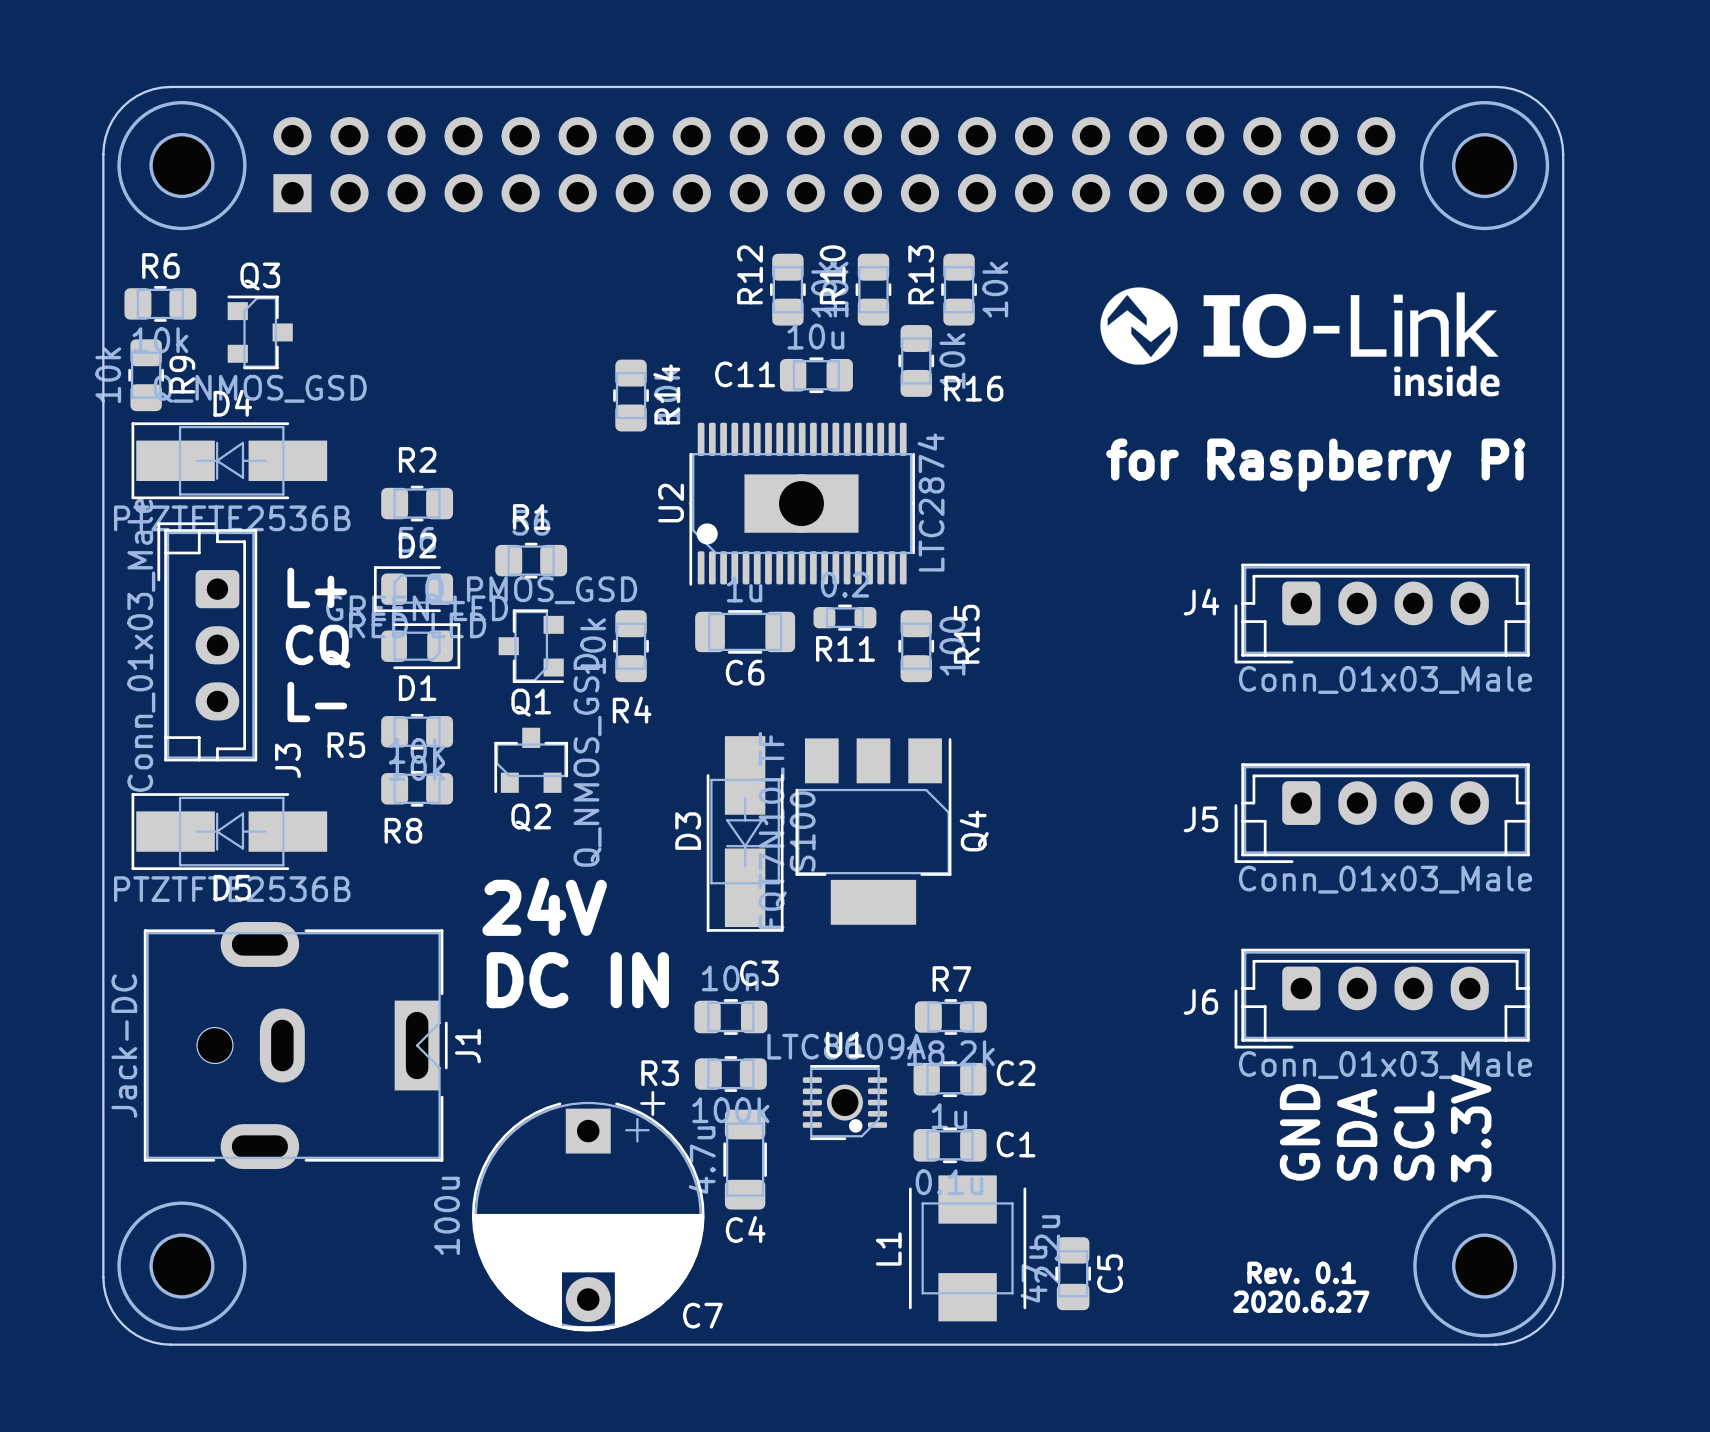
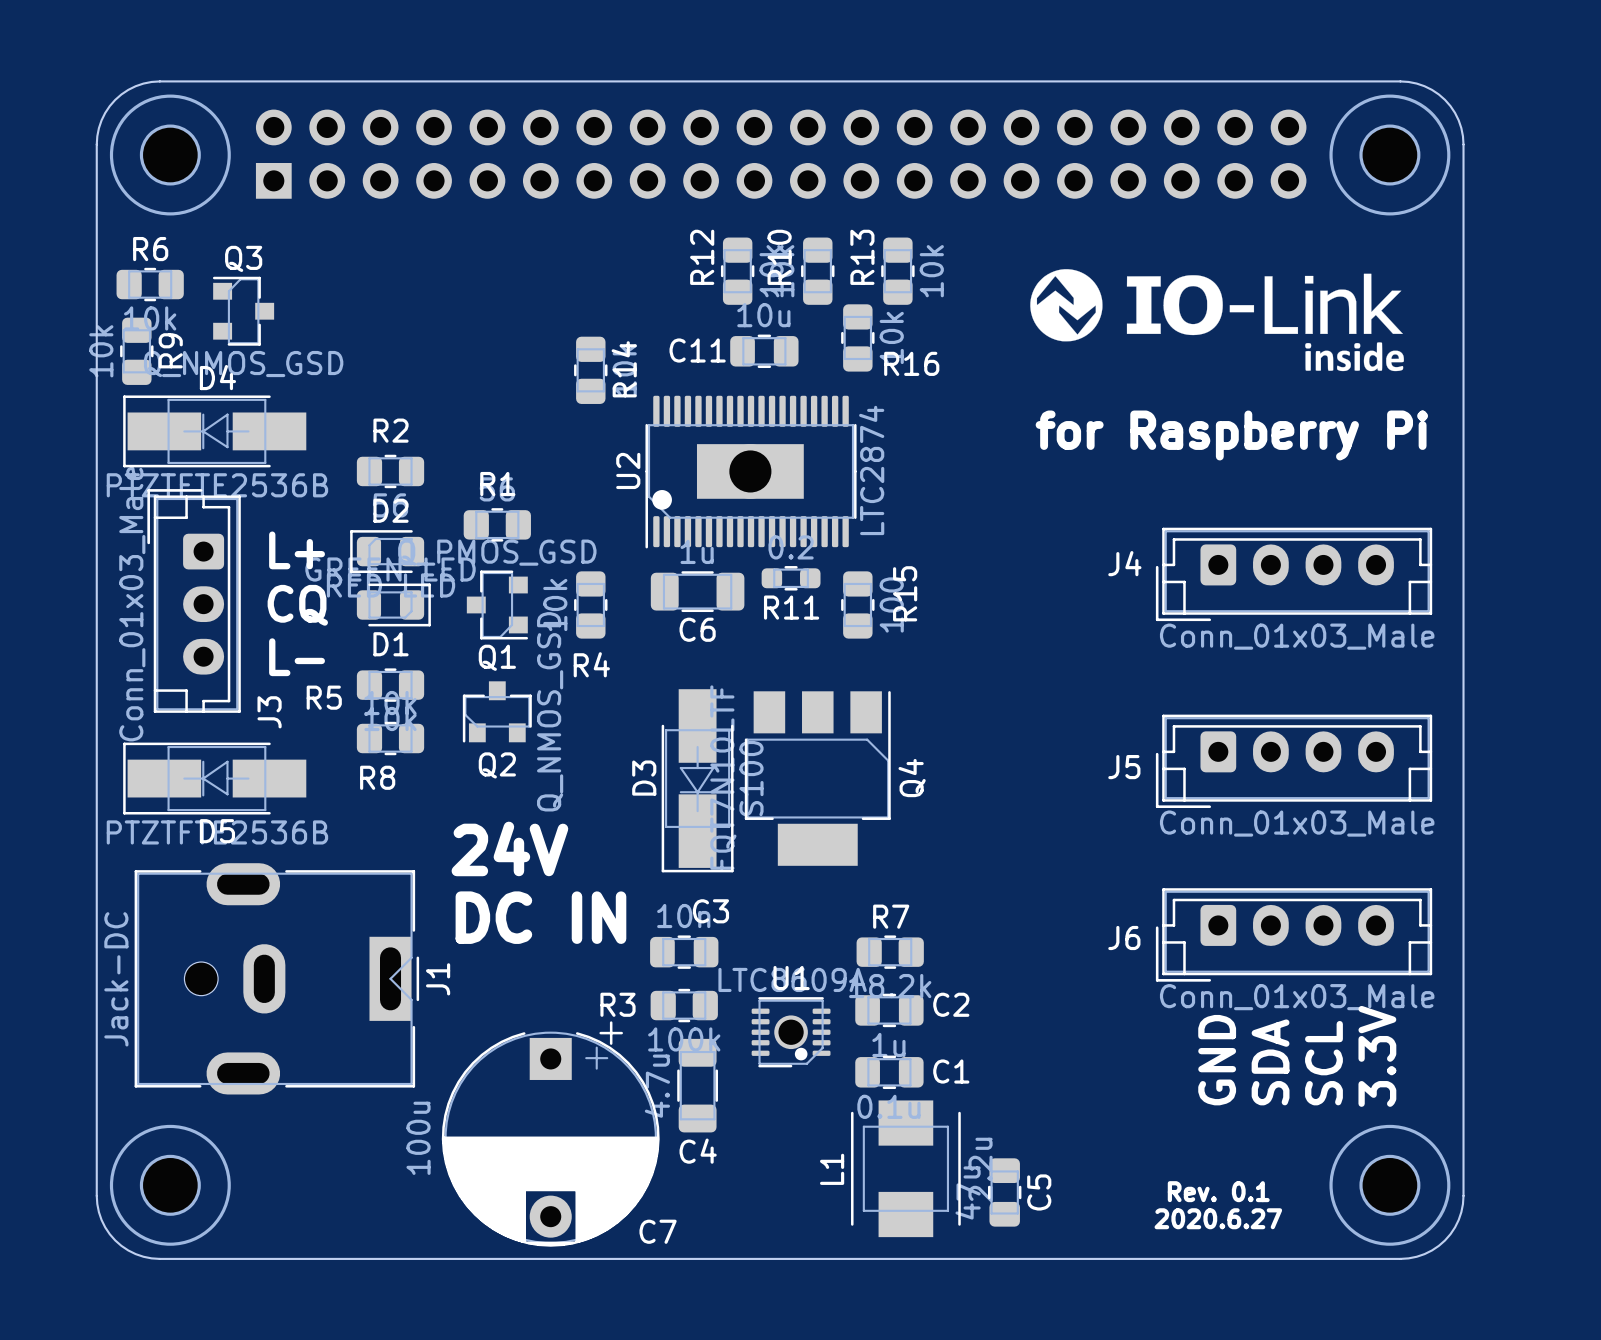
part footprint: [1413, 1194, 1556, 1338] -> [1329, 1124, 1451, 1246]

